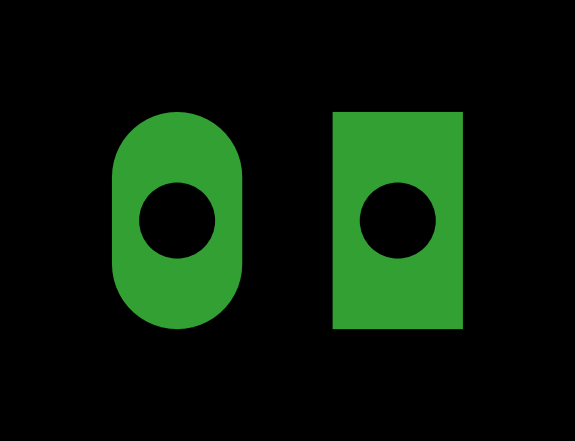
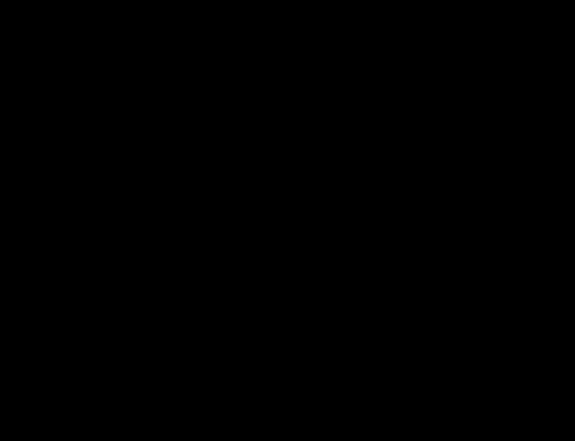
part: (287, 220) -> none

